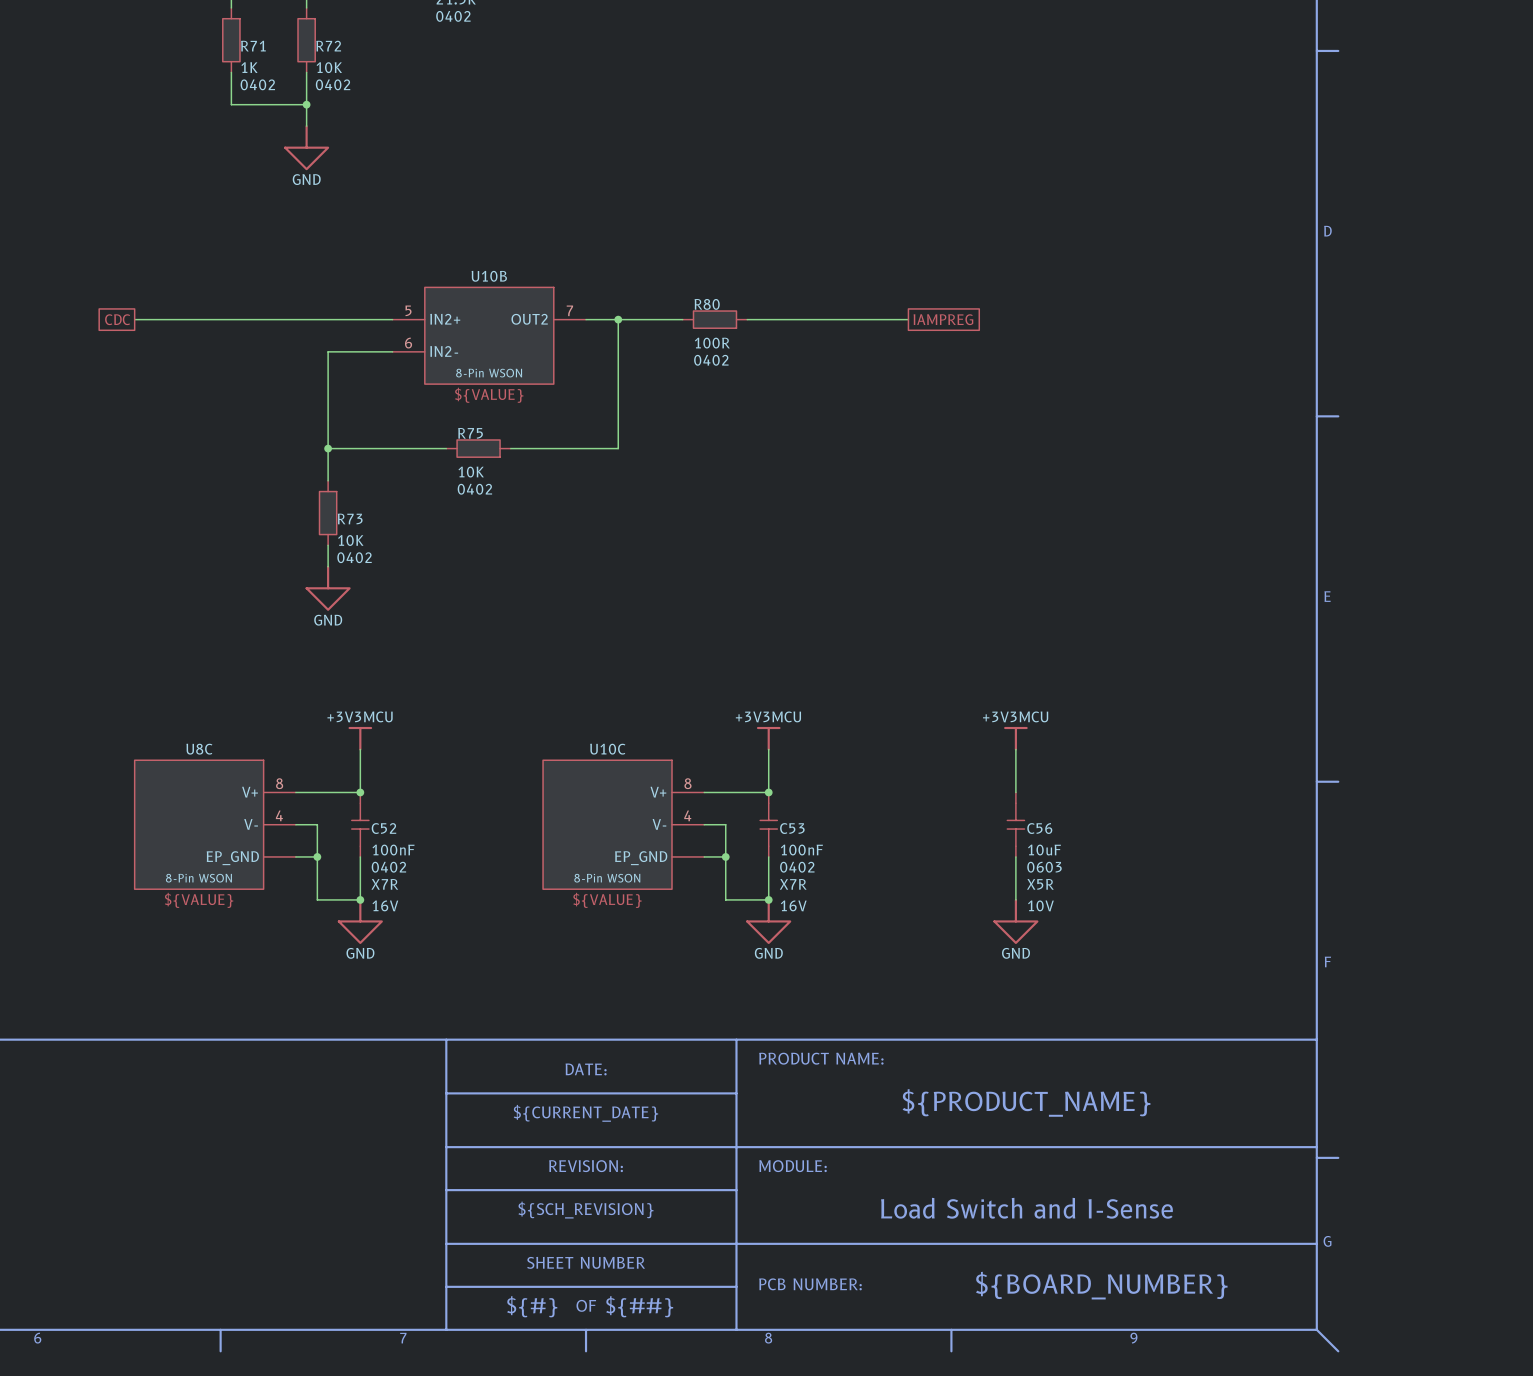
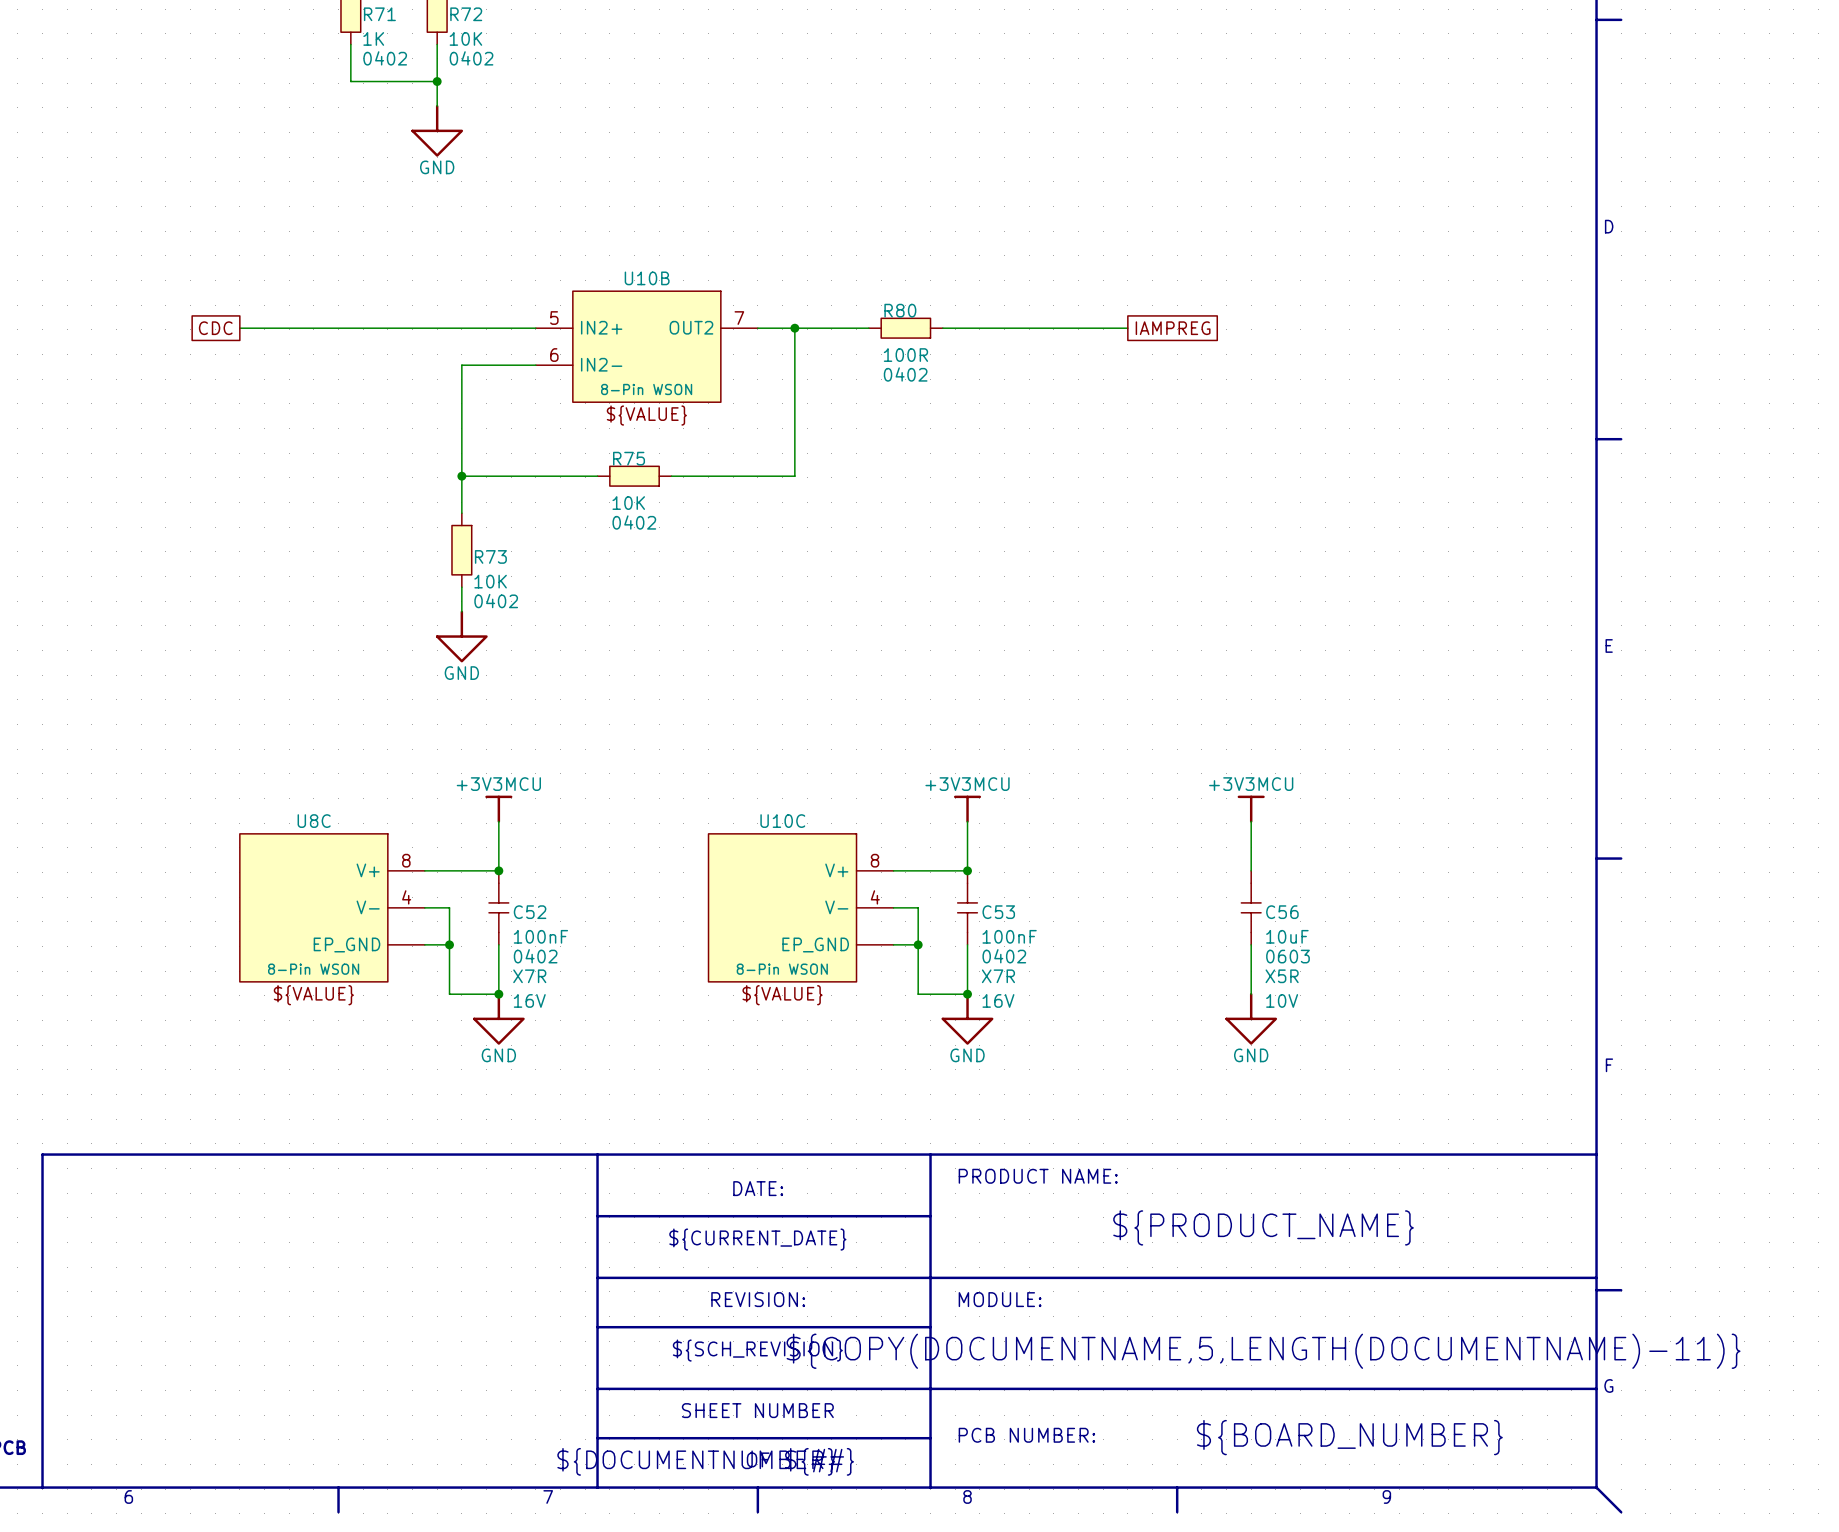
text: Load Switch and I-Sense (1026, 1208) -> ${COPY(DOCUMENTNAME,5,LENGTH(DOCUMENTNAME)-11)} (1263, 1351)
text: ${#} (532, 1306) -> ${DOCUMENTNUMBER} (696, 1461)

